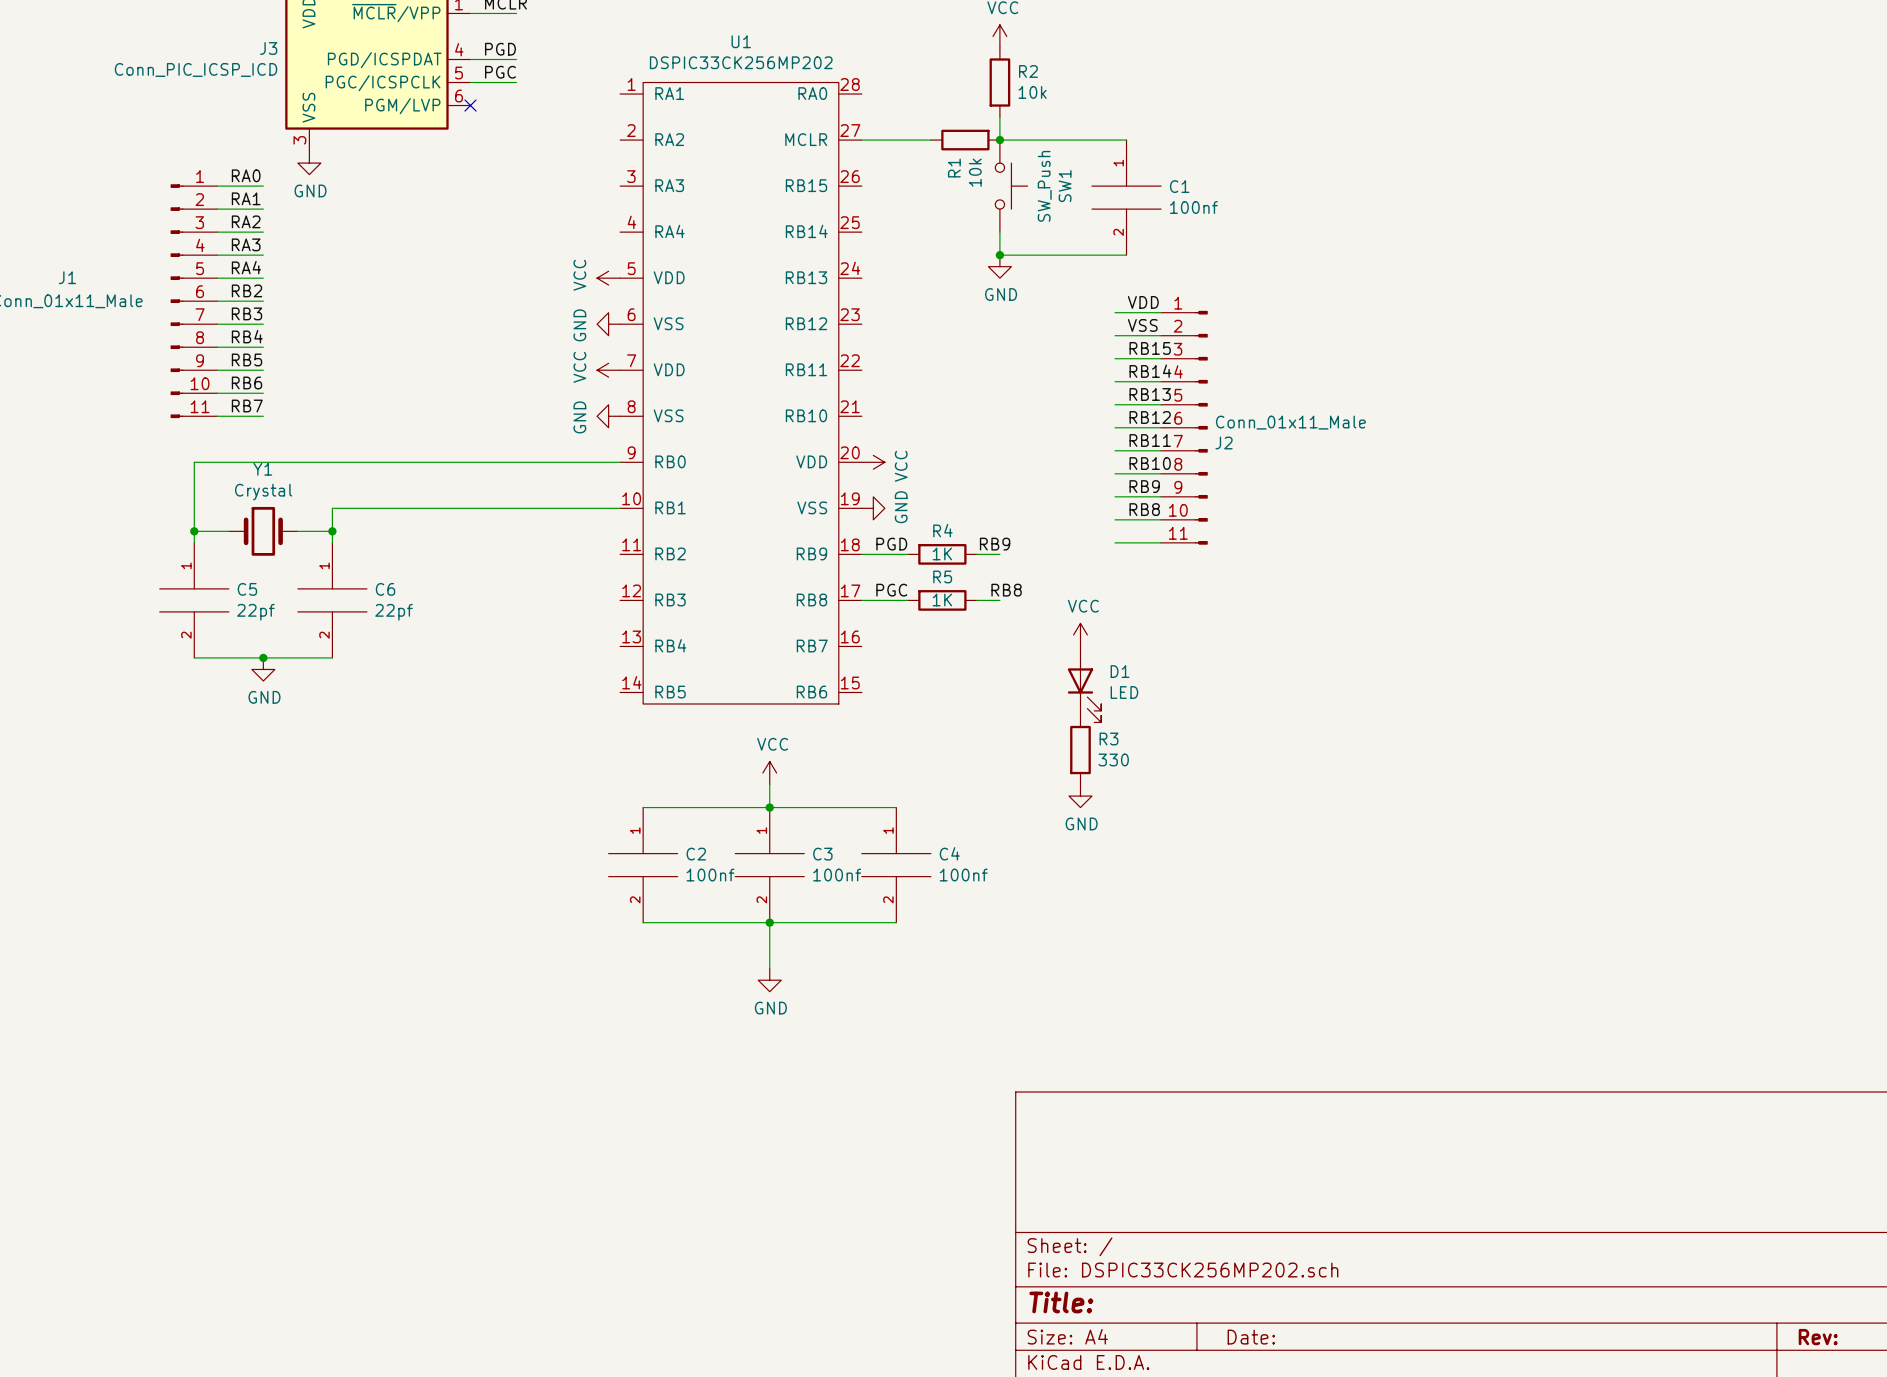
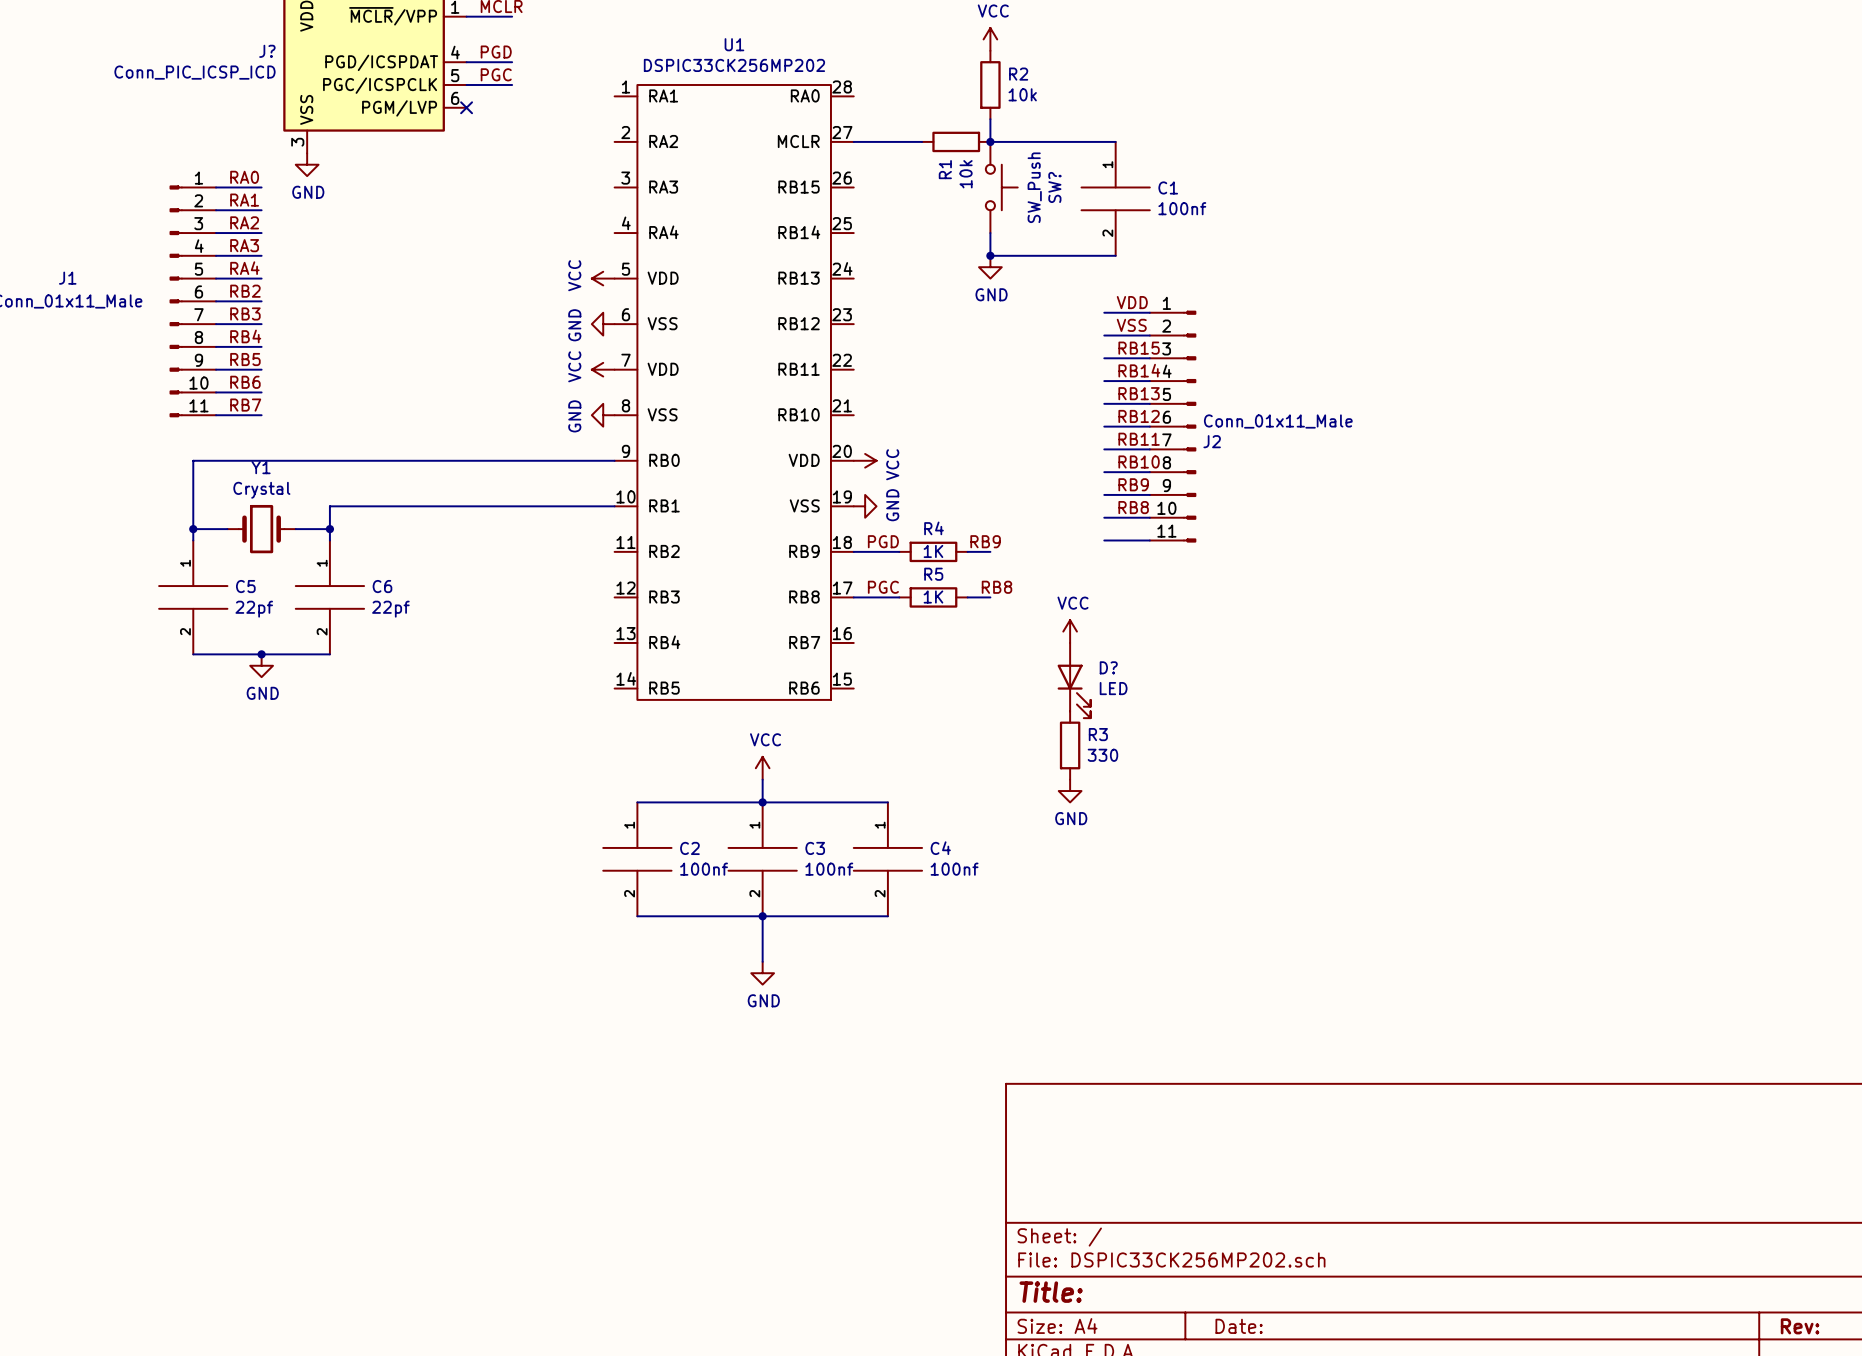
J3 name: J3 (268, 48) -> J? (267, 51)
SW1 name: SW1 (1065, 186) -> SW? (1054, 187)
D1 name: D1 (1120, 671) -> D? (1108, 667)

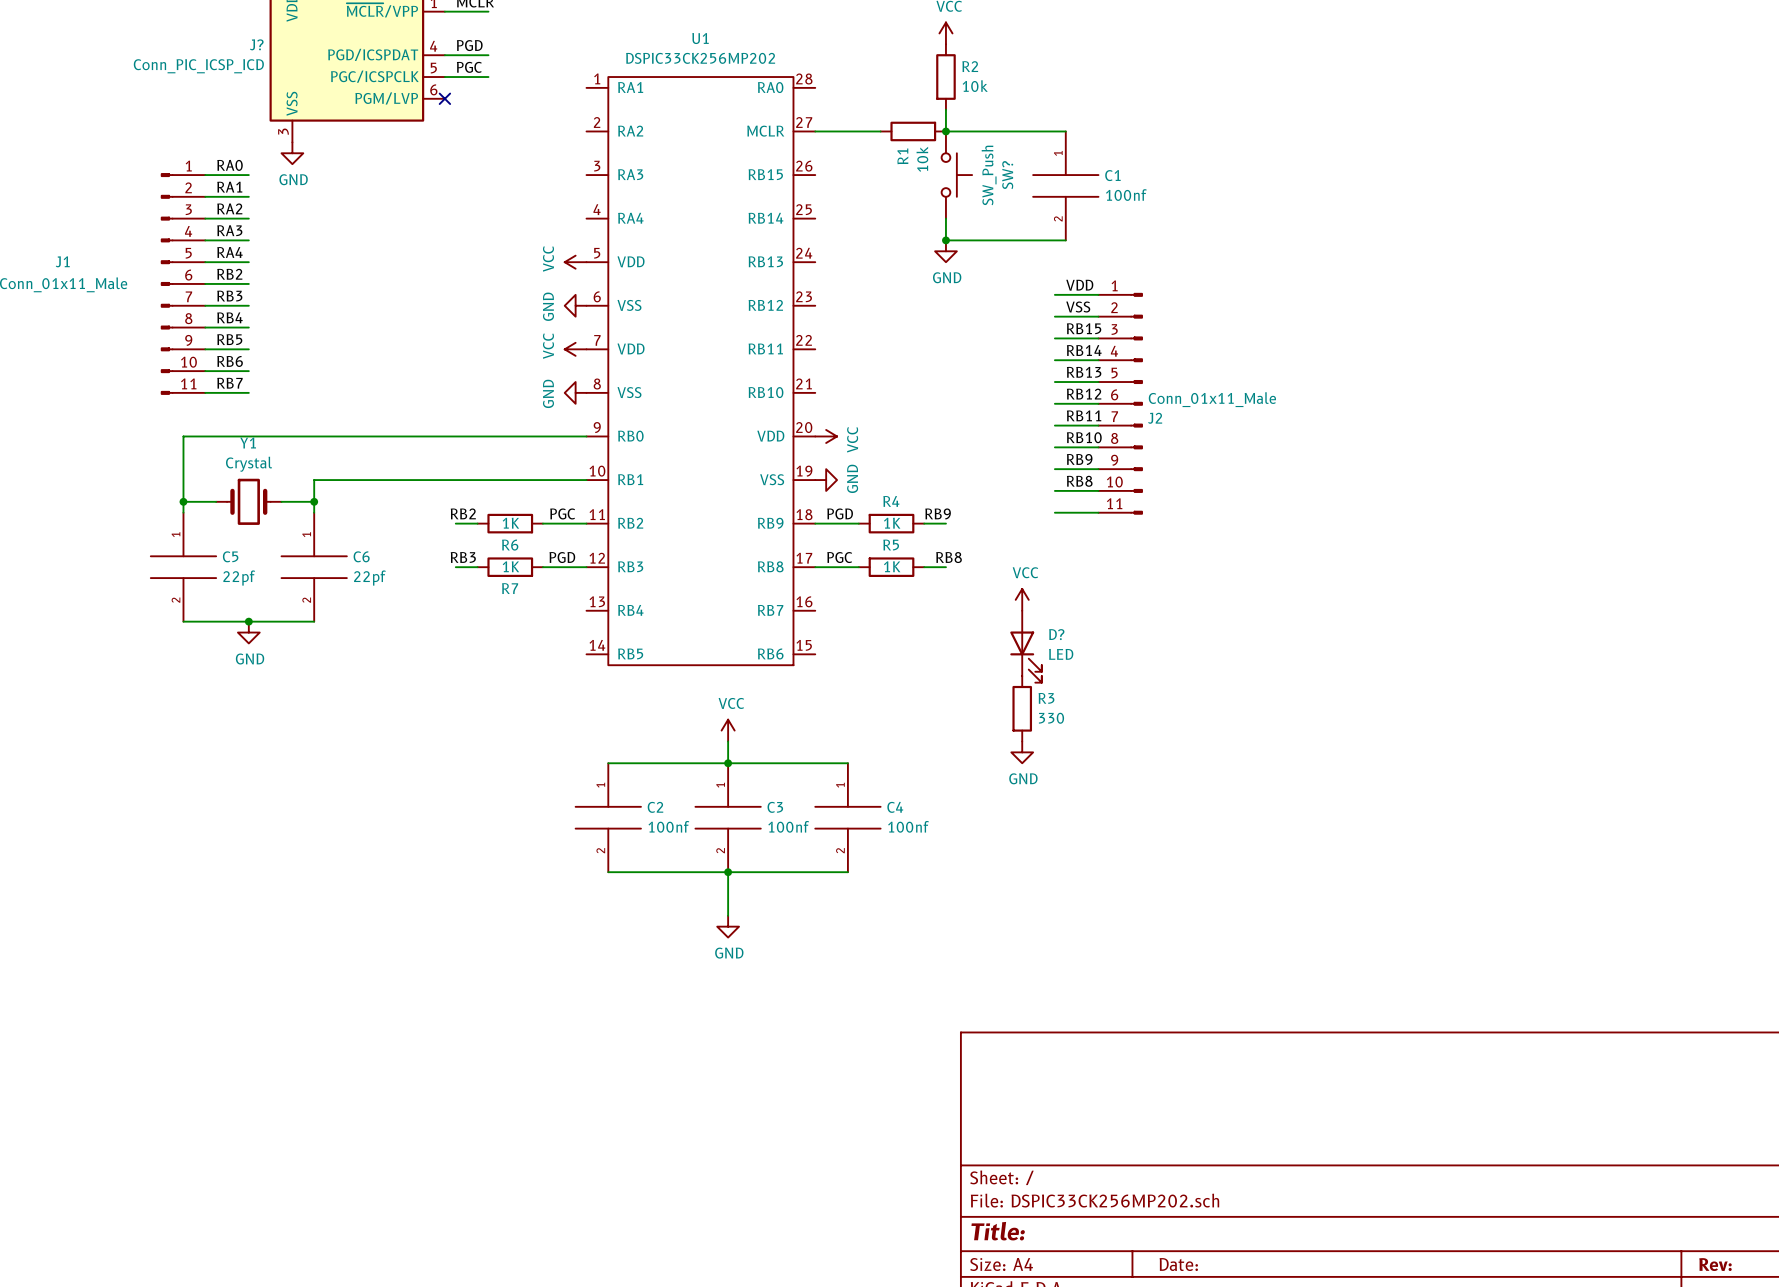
label: none -> RB2 (463, 513)
label: none -> PGC (562, 513)
wire: none -> (455, 523) (477, 523)
R6: none -> 1K (510, 523)
wire: none -> (542, 523) (586, 523)
label: none -> RB3 (463, 557)
label: none -> PGD (562, 557)
wire: none -> (455, 567) (477, 567)
R7: none -> 1K (510, 567)
wire: none -> (542, 567) (586, 567)

